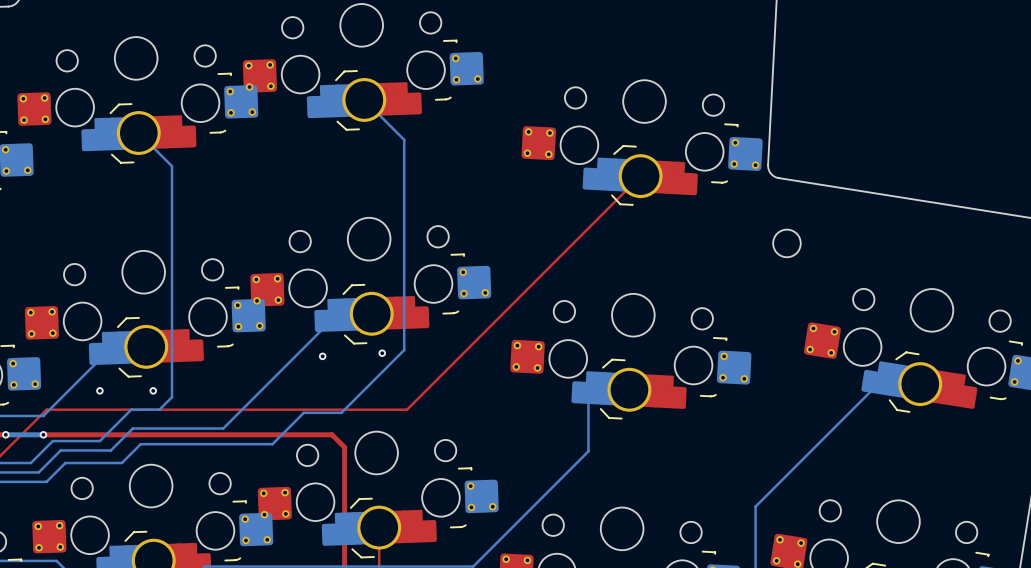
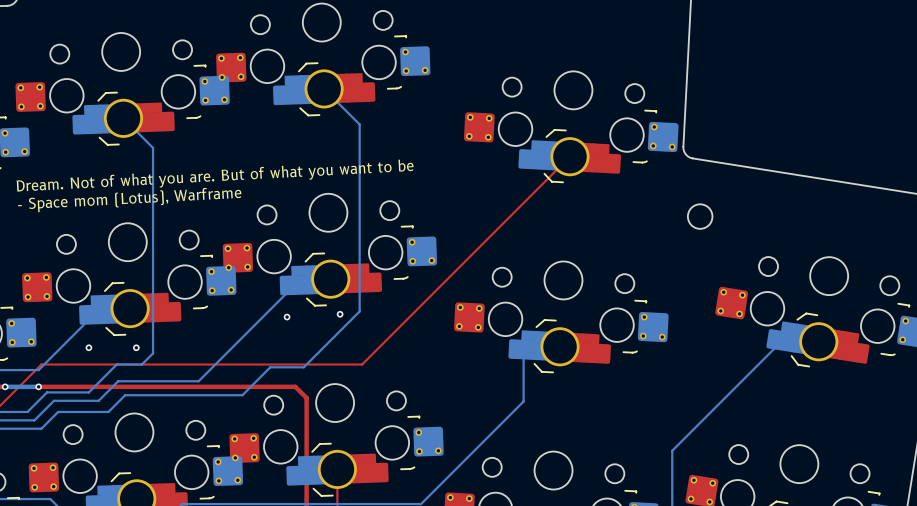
text: none -> Dream. Not of what you are. But of what you want to be (215, 175)
text: none -> - Space mom (Lotus), Warframe (129, 200)

